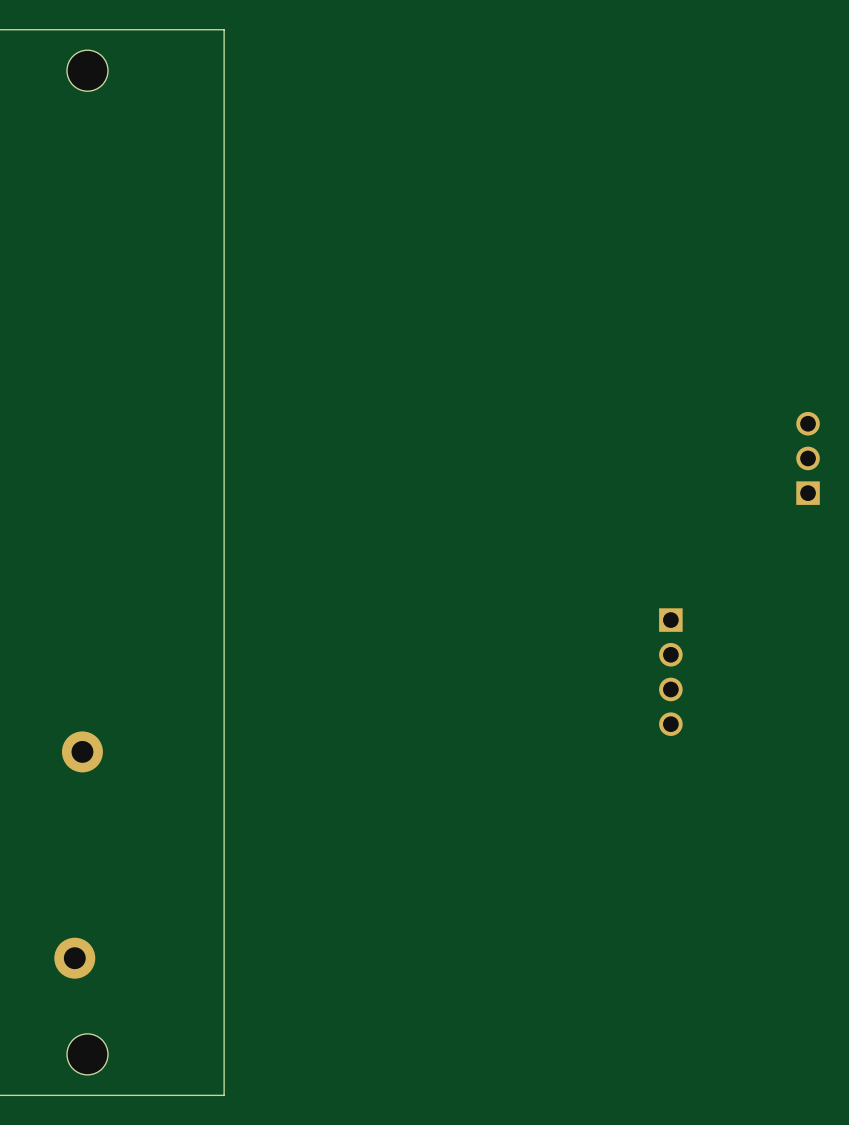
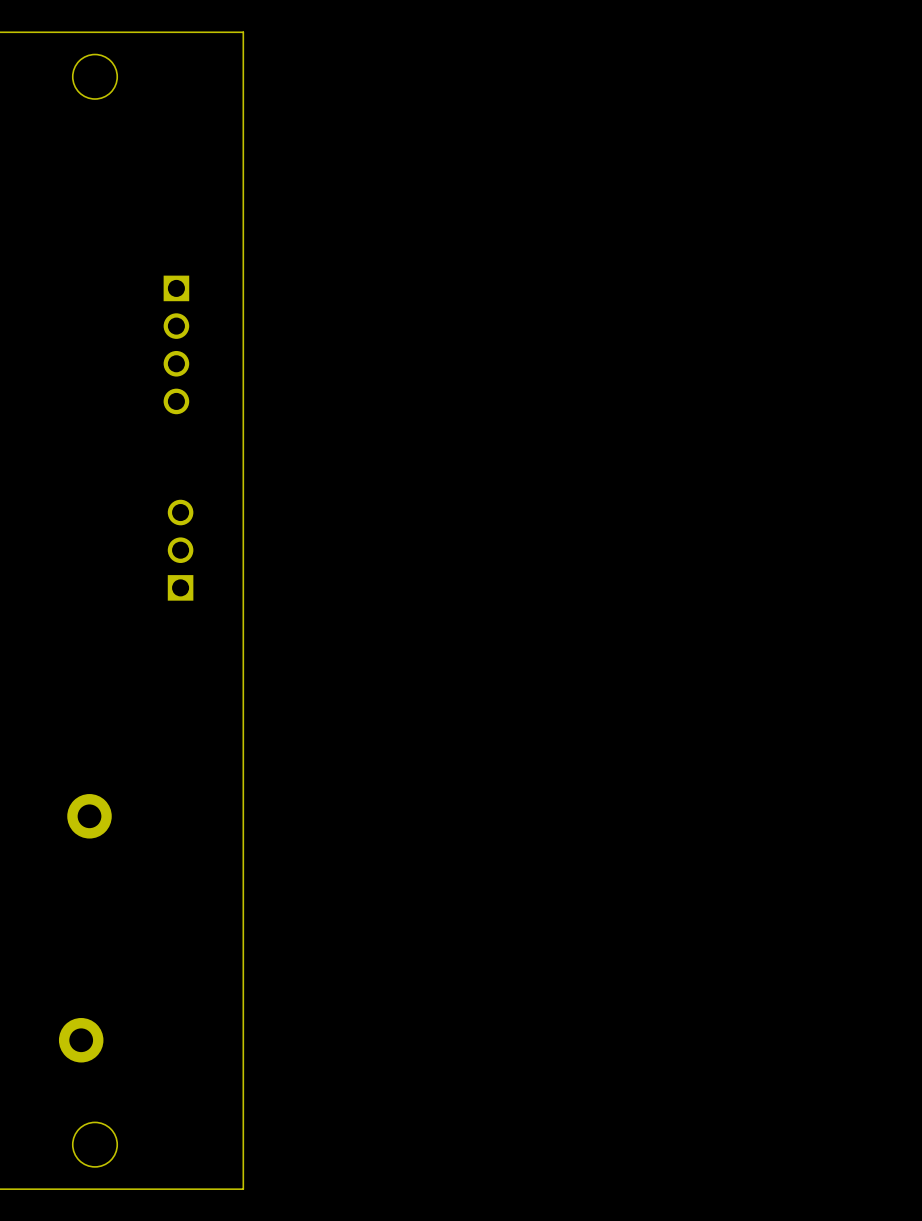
part: none -> (176, 344)
part: (808, 458) -> none
part: none -> (180, 550)
part: (670, 672) -> none

